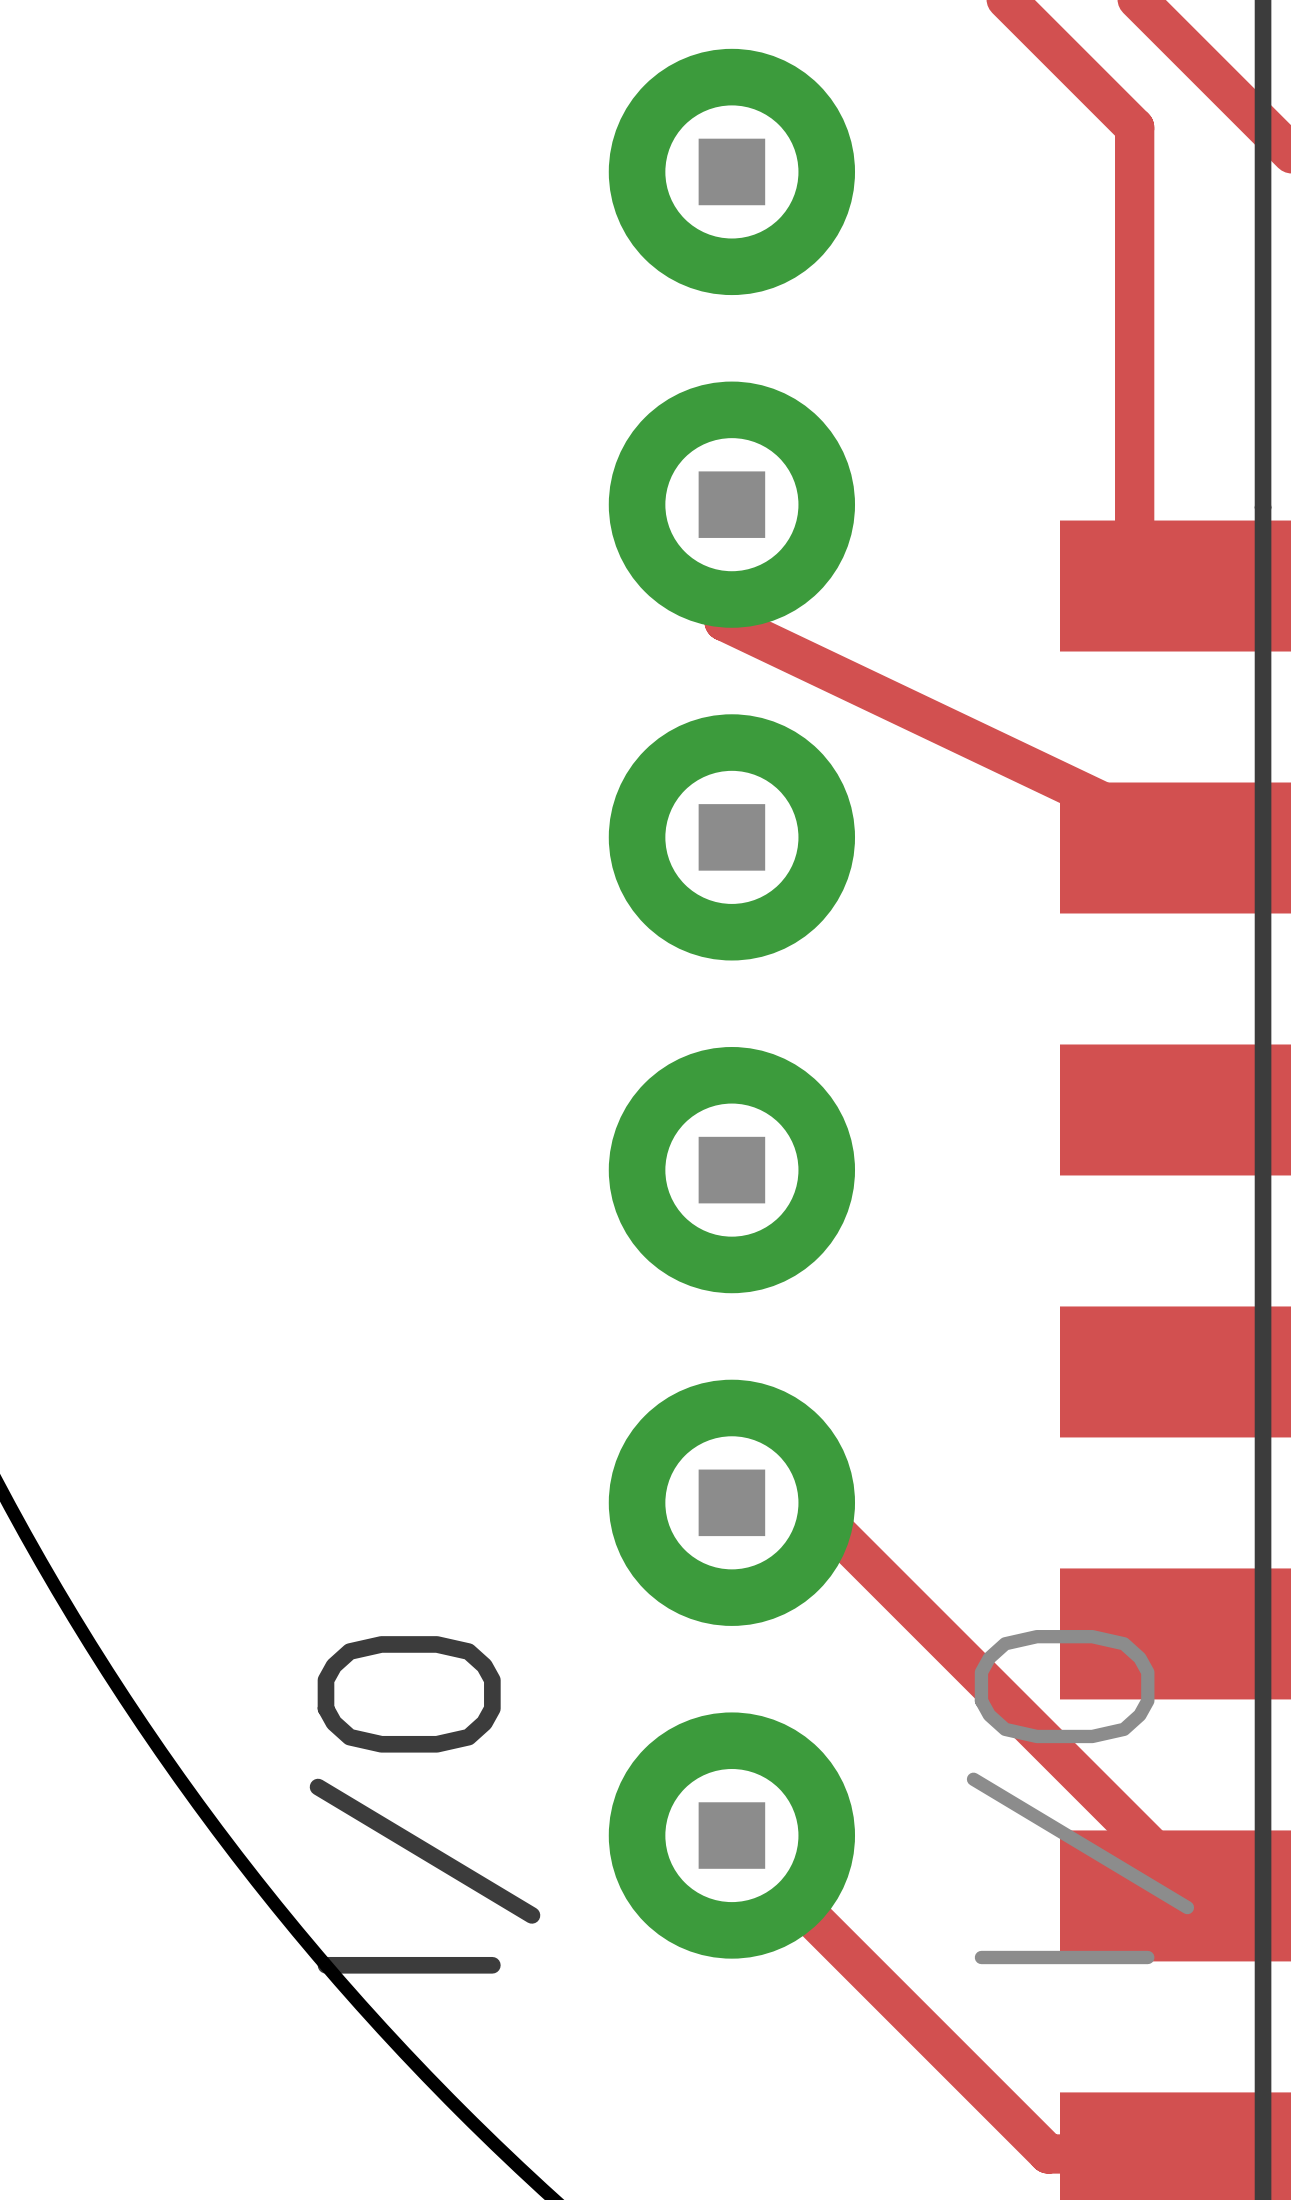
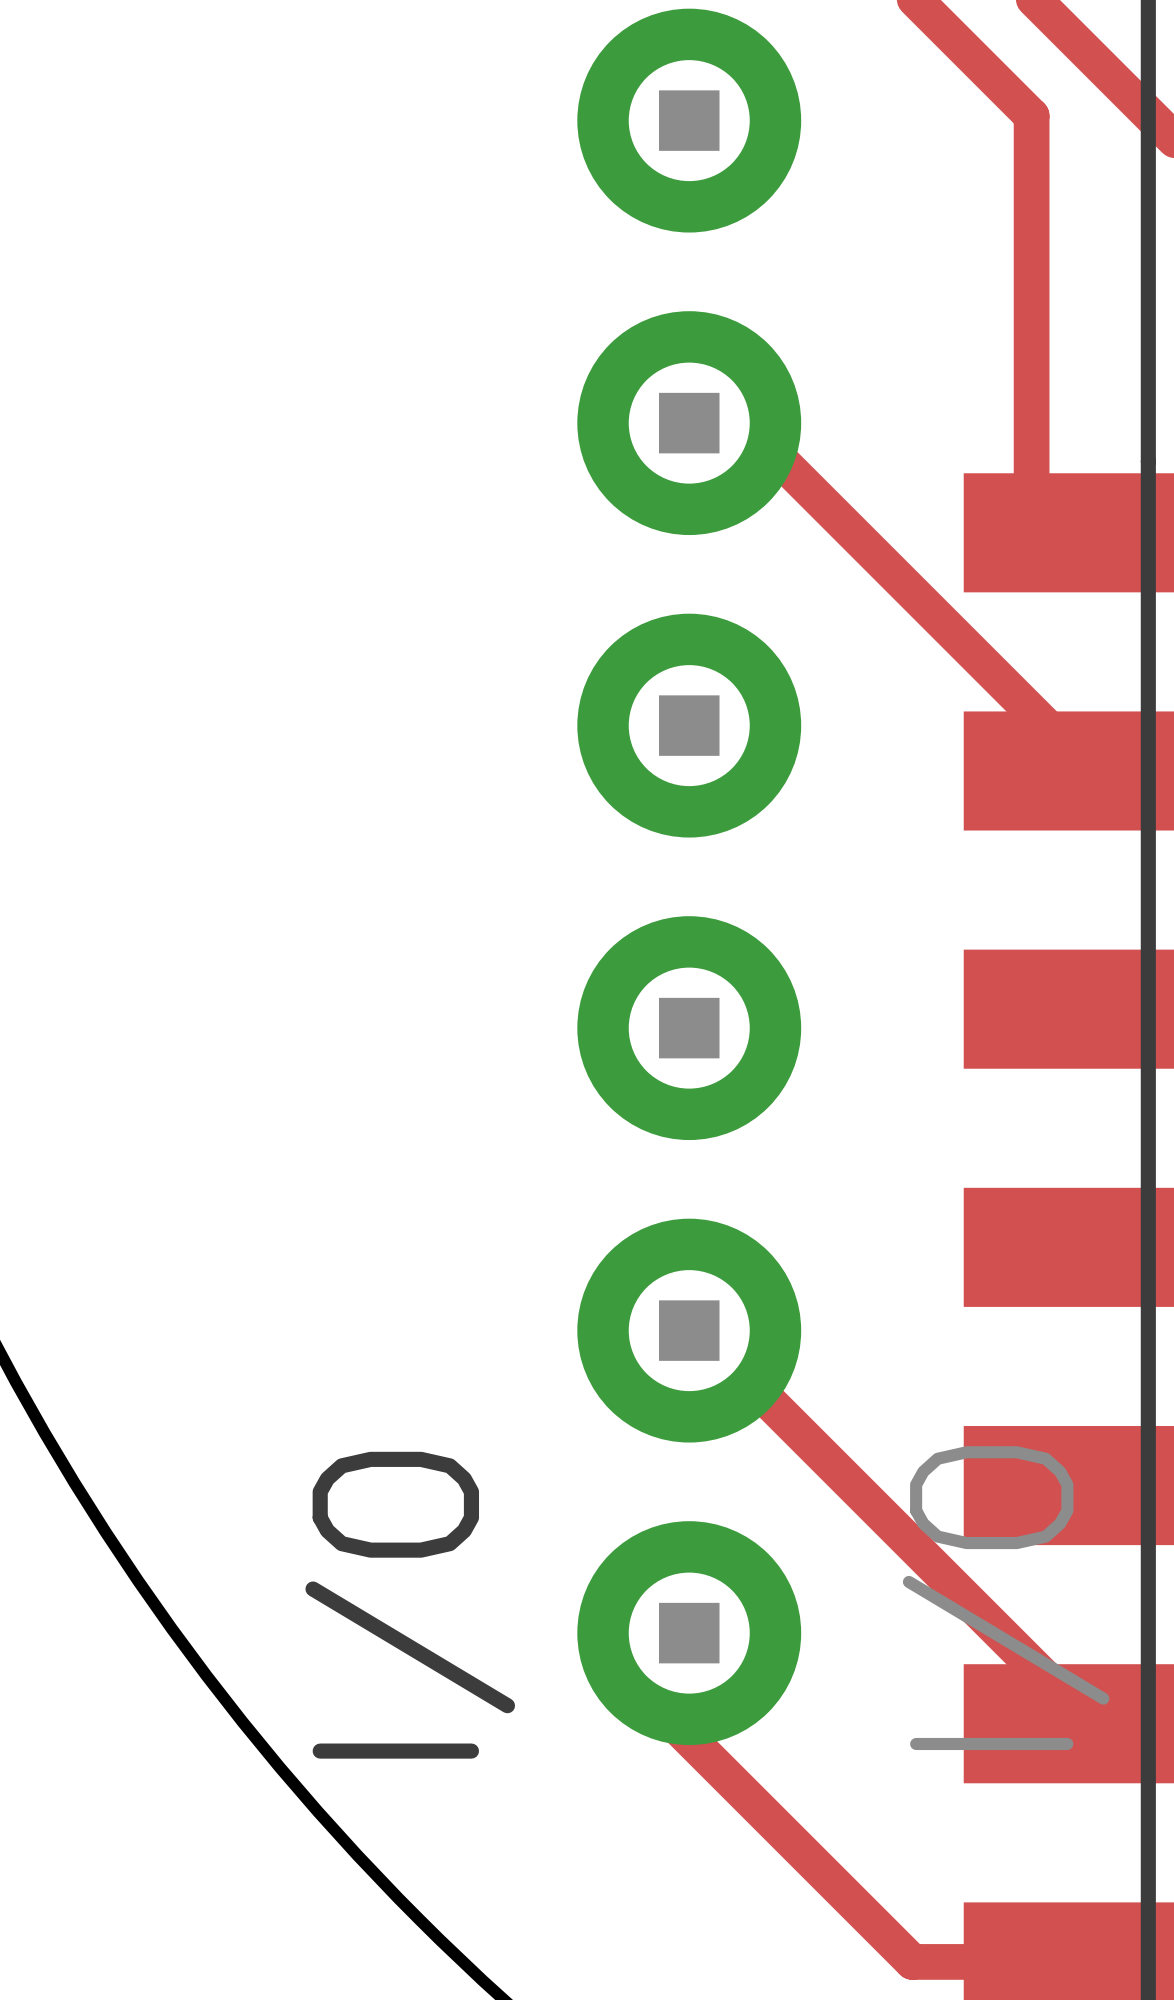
track: (731, 504) (724, 621) (1200, 848) -> (689, 423) (733, 413) (1091, 770)
I/O position: (731, 1003) -> (689, 876)
track: (731, 1835) (1048, 2153) (1219, 2153) (1223, 2157) -> (689, 1633) (674, 1664) (674, 1723) (912, 1961) (1112, 1961)

